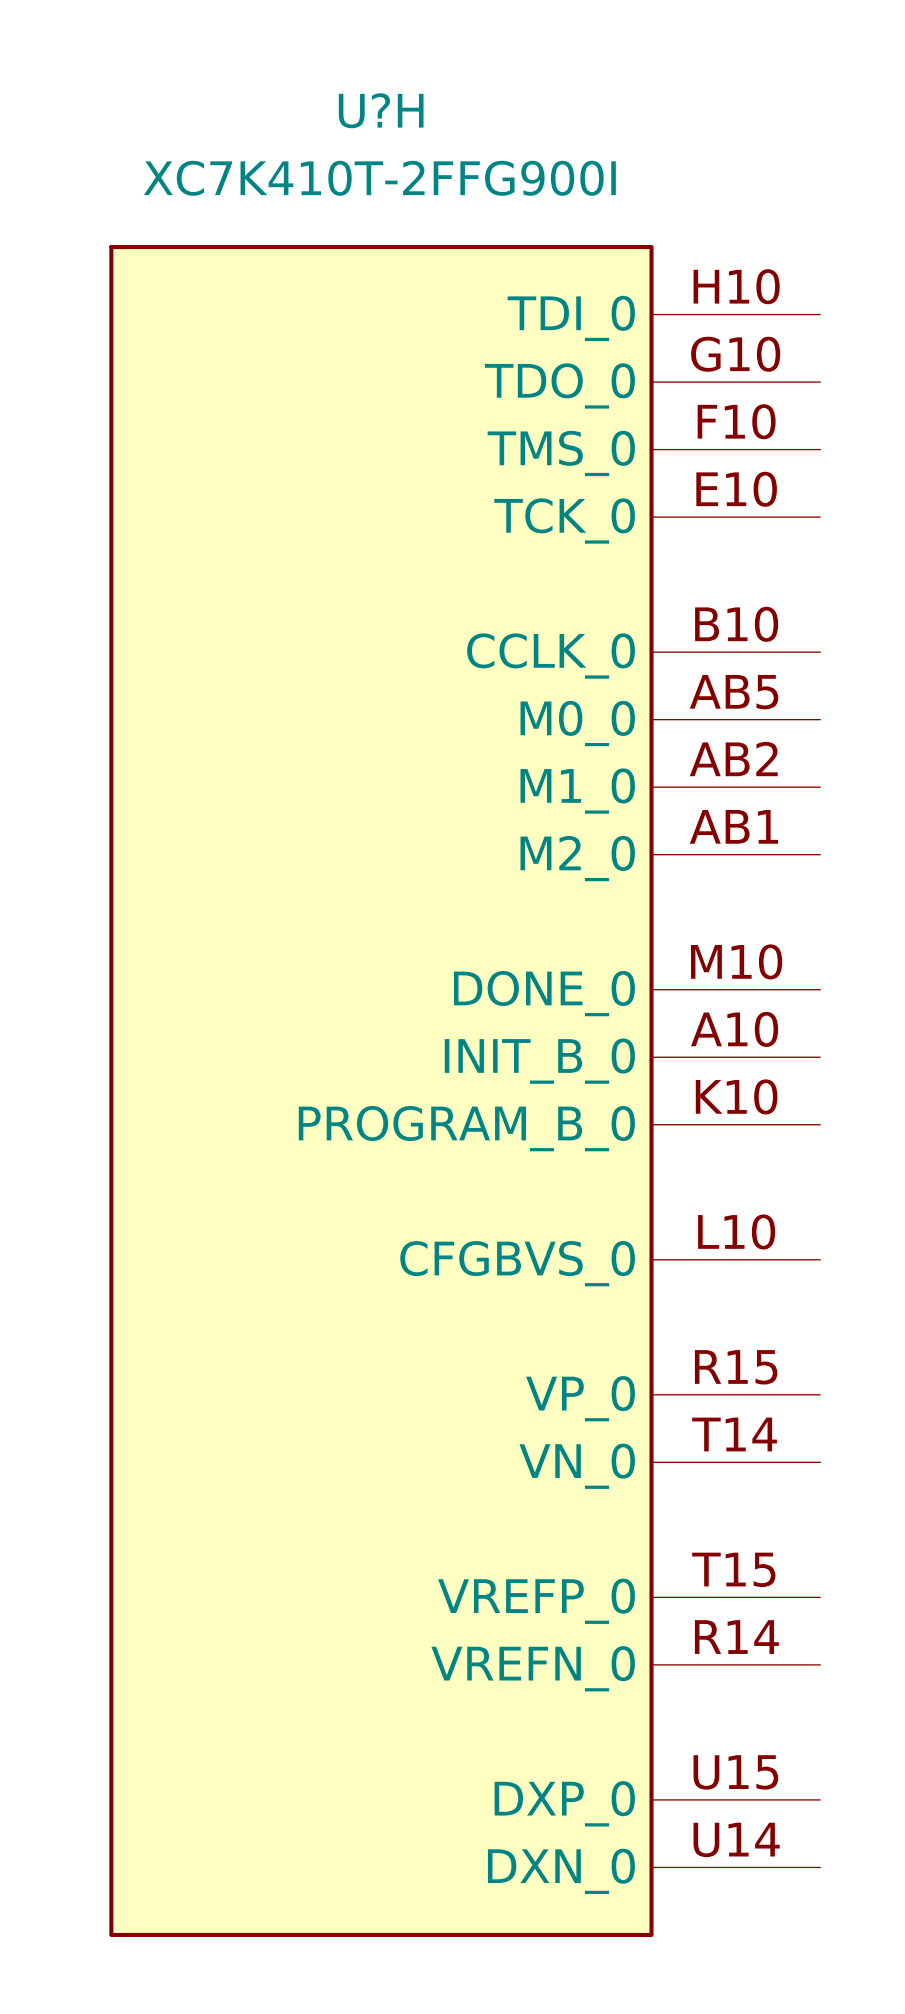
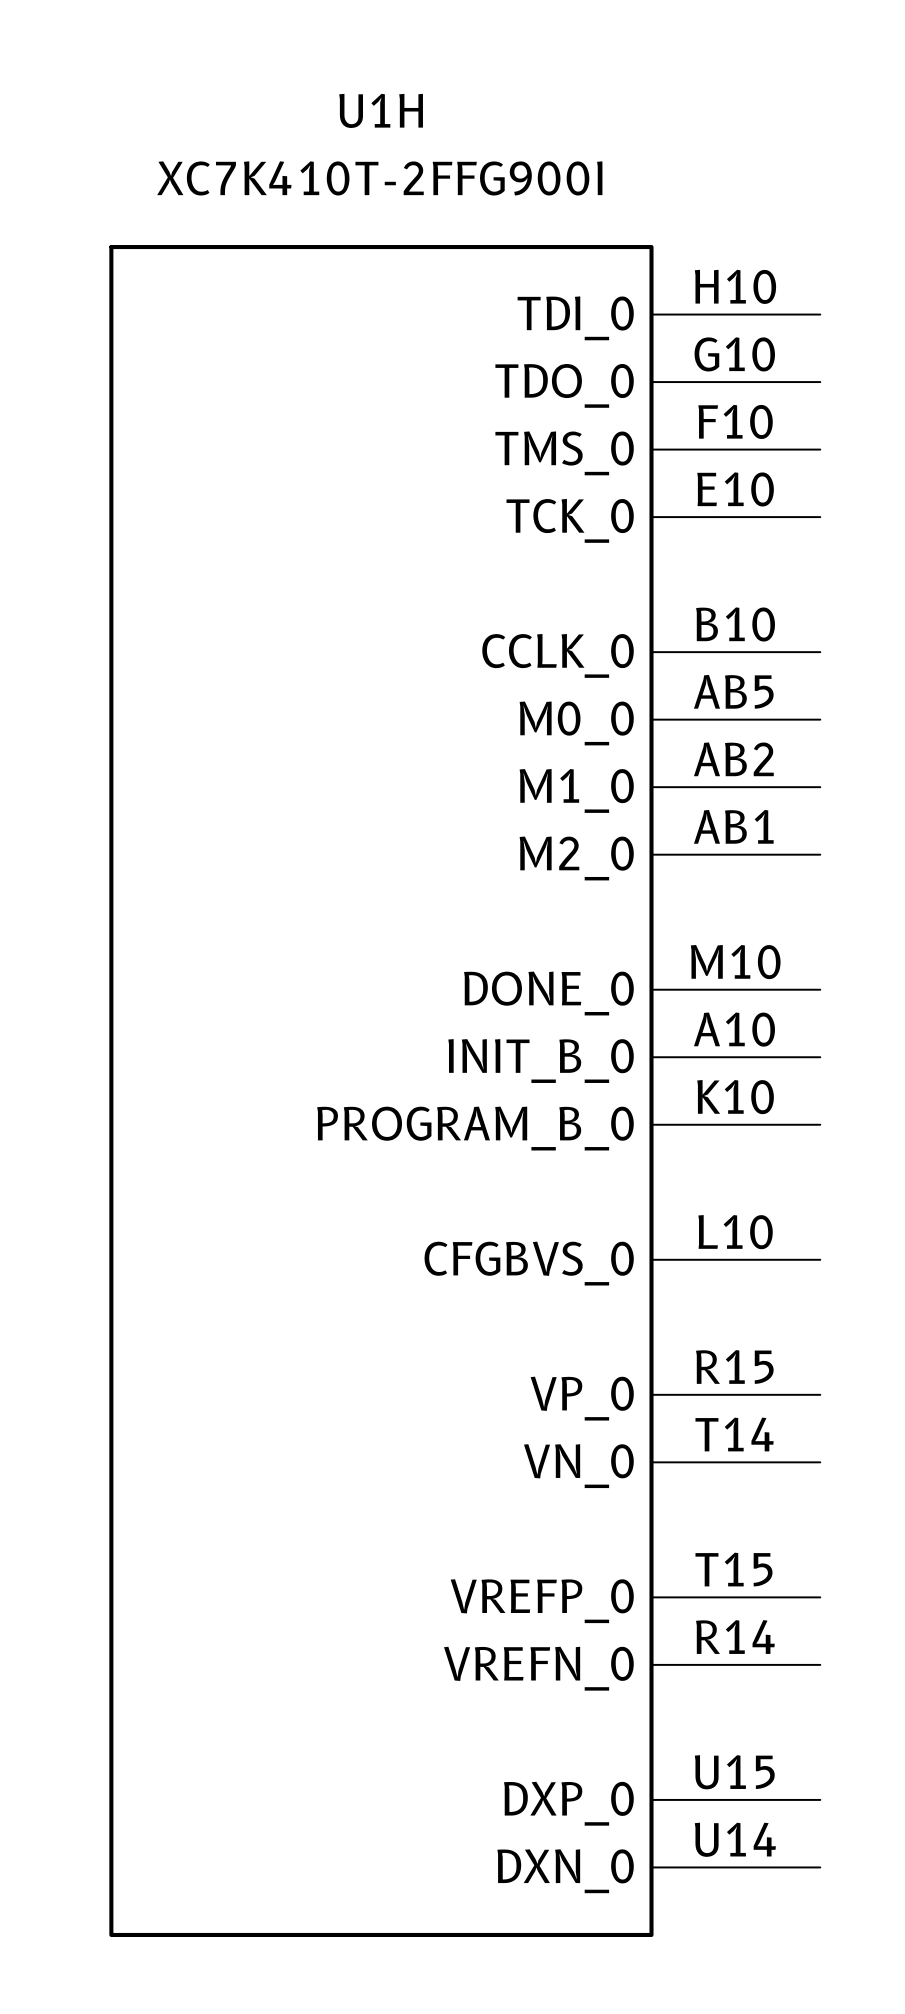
U?H name: U?H (381, 110) -> U1H (381, 110)

